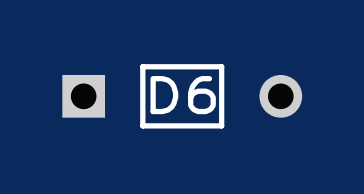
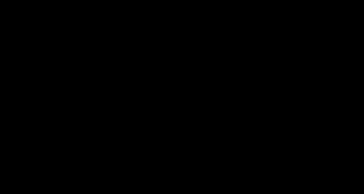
D6: (182, 96) -> none

